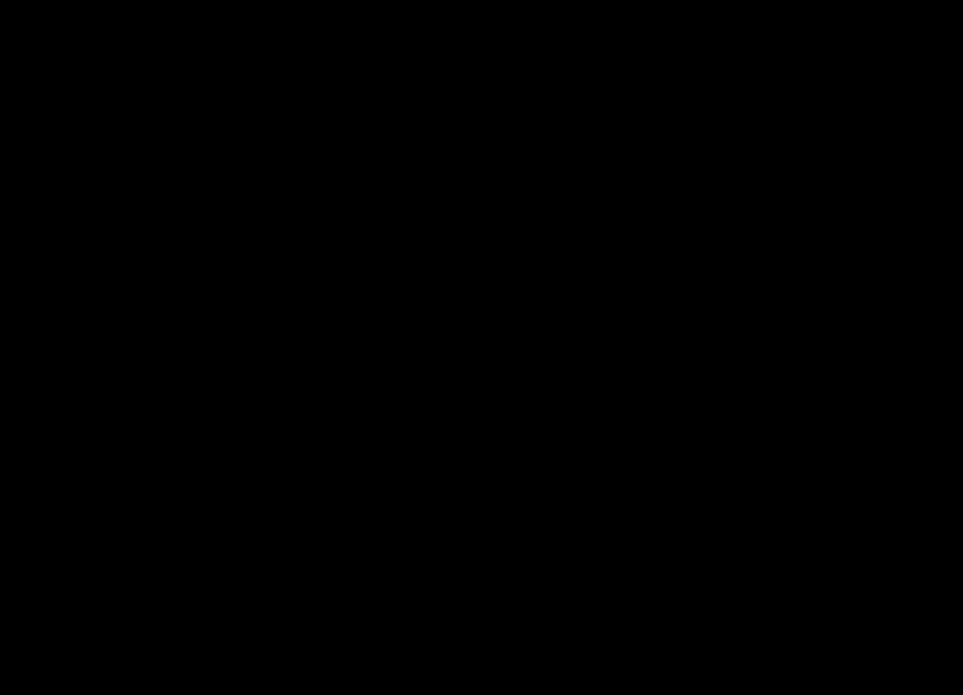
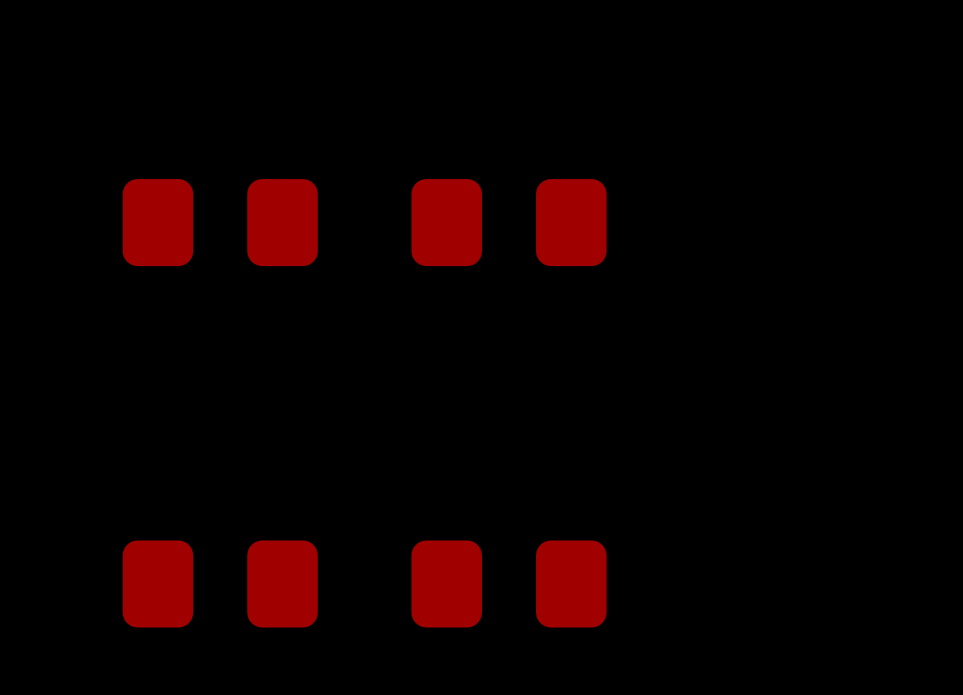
part: none -> (220, 222)
part: none -> (509, 222)
part: none -> (220, 583)
part: none -> (509, 583)

